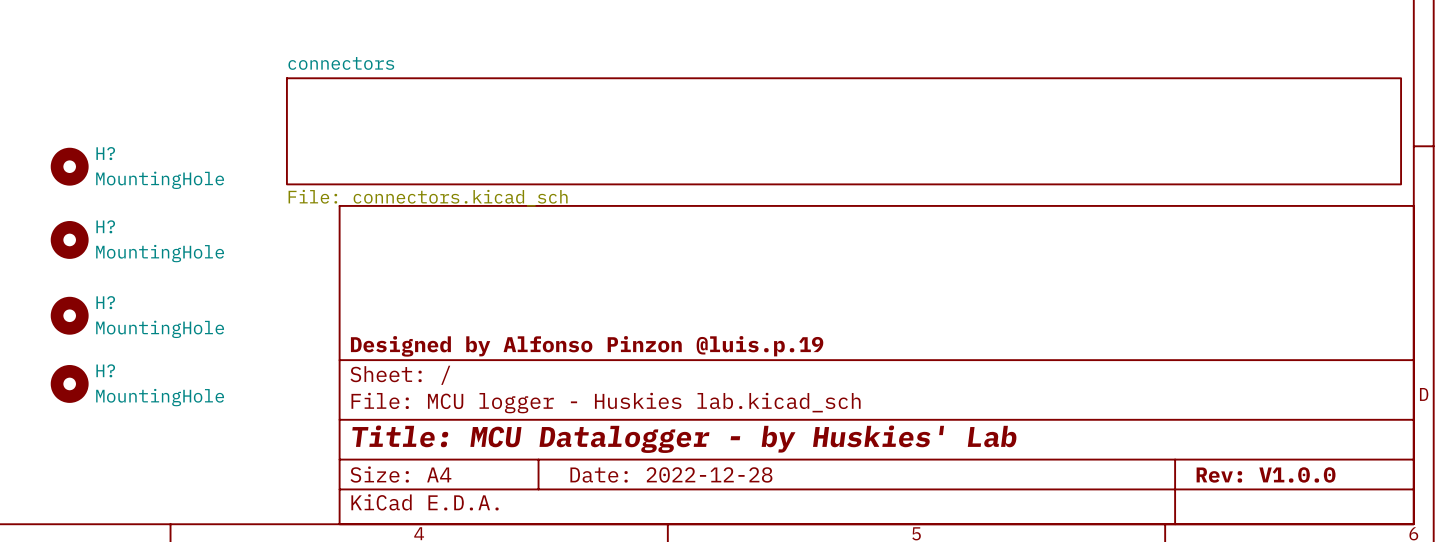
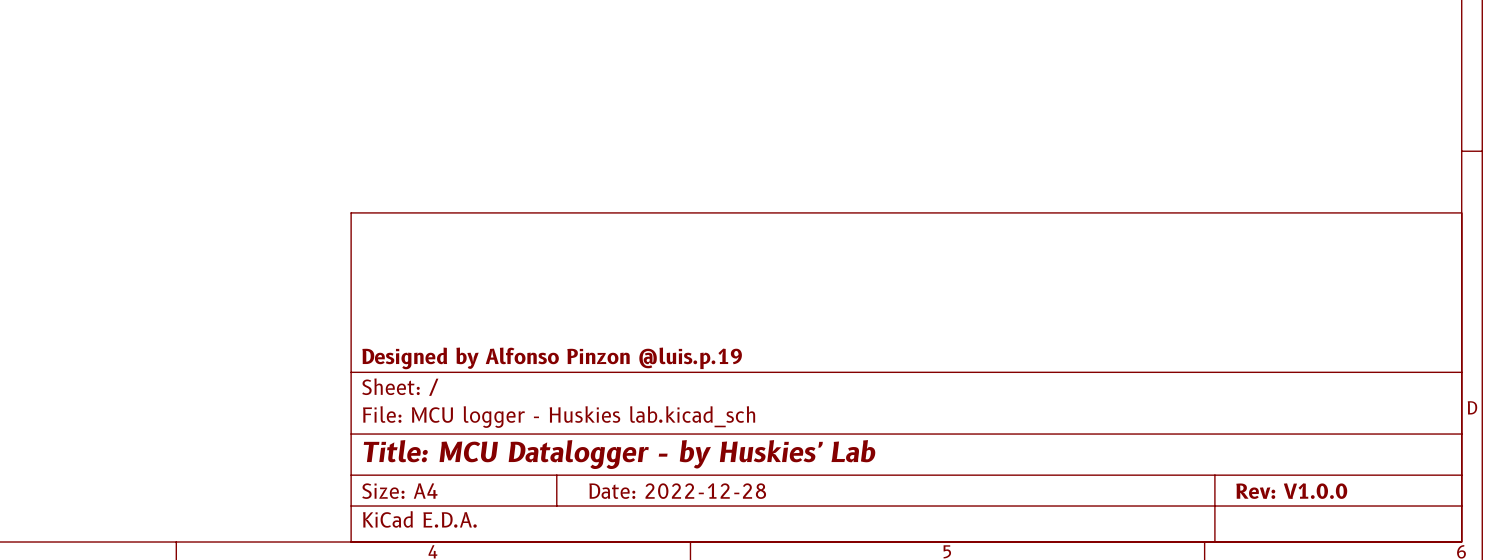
sheet connectors: File: connectors.kicad_sch (844, 131) -> none
H?: MountingHole (69, 166) -> none
H?: MountingHole (69, 239) -> none
H?: MountingHole (69, 315) -> none
H?: MountingHole (69, 383) -> none

